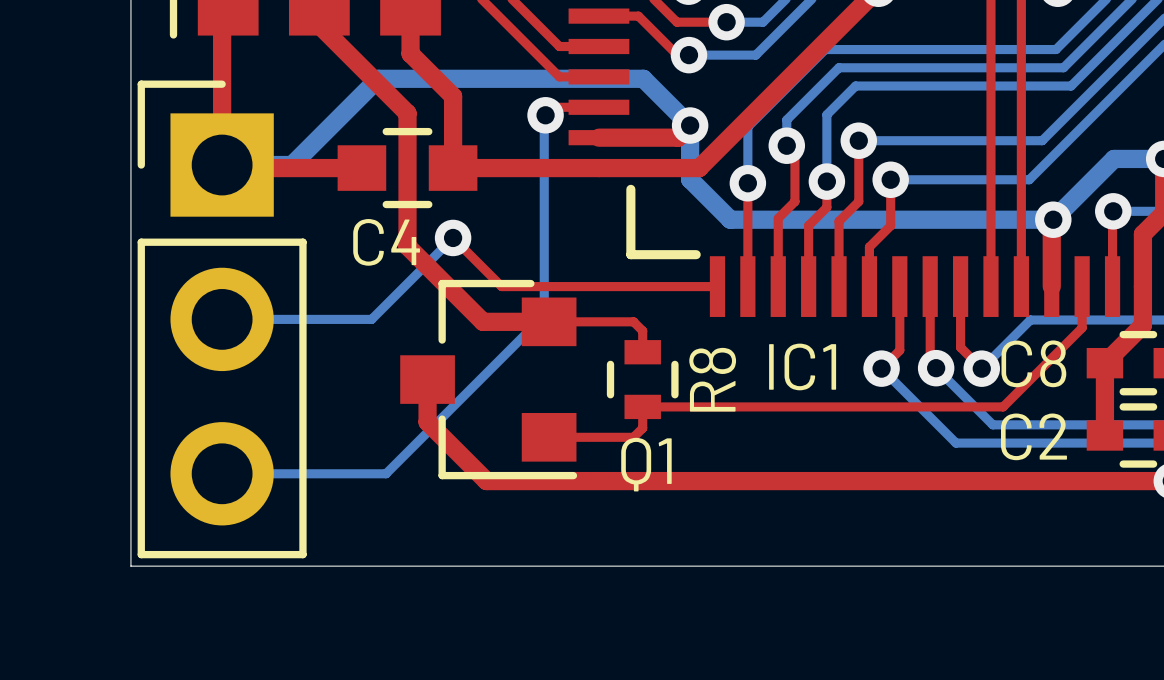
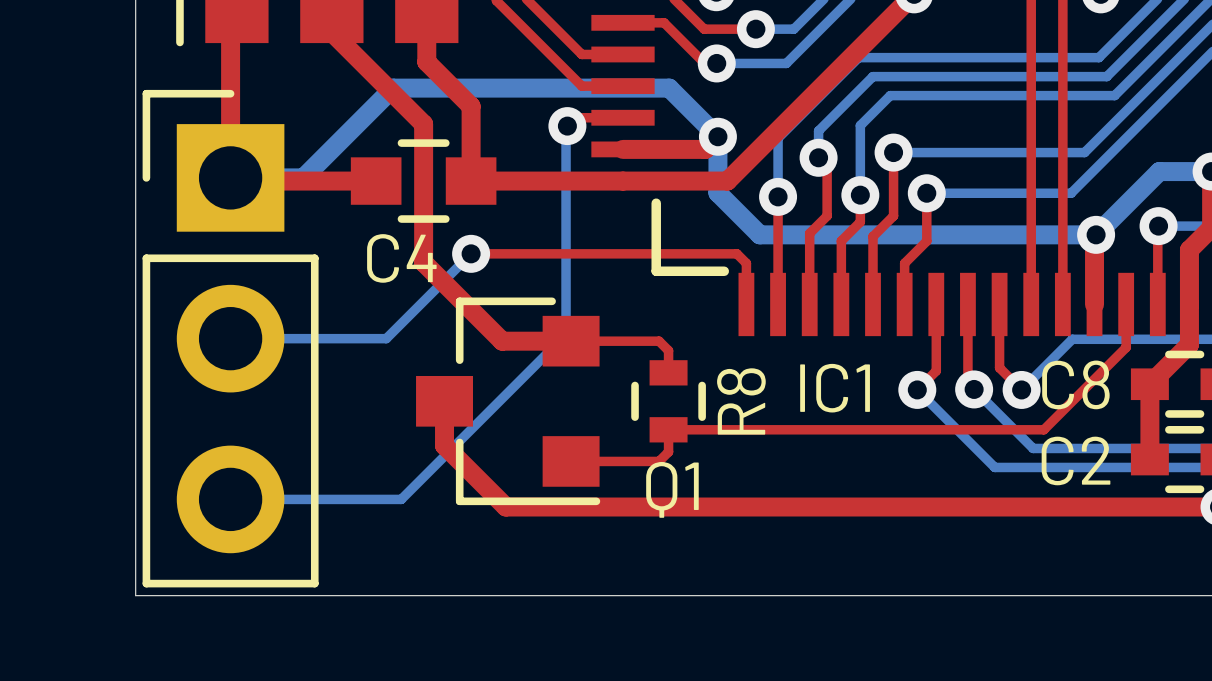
top track: (453, 237) (501, 286) (717, 286) -> (471, 253) (736, 253) (746, 263) (746, 304)

